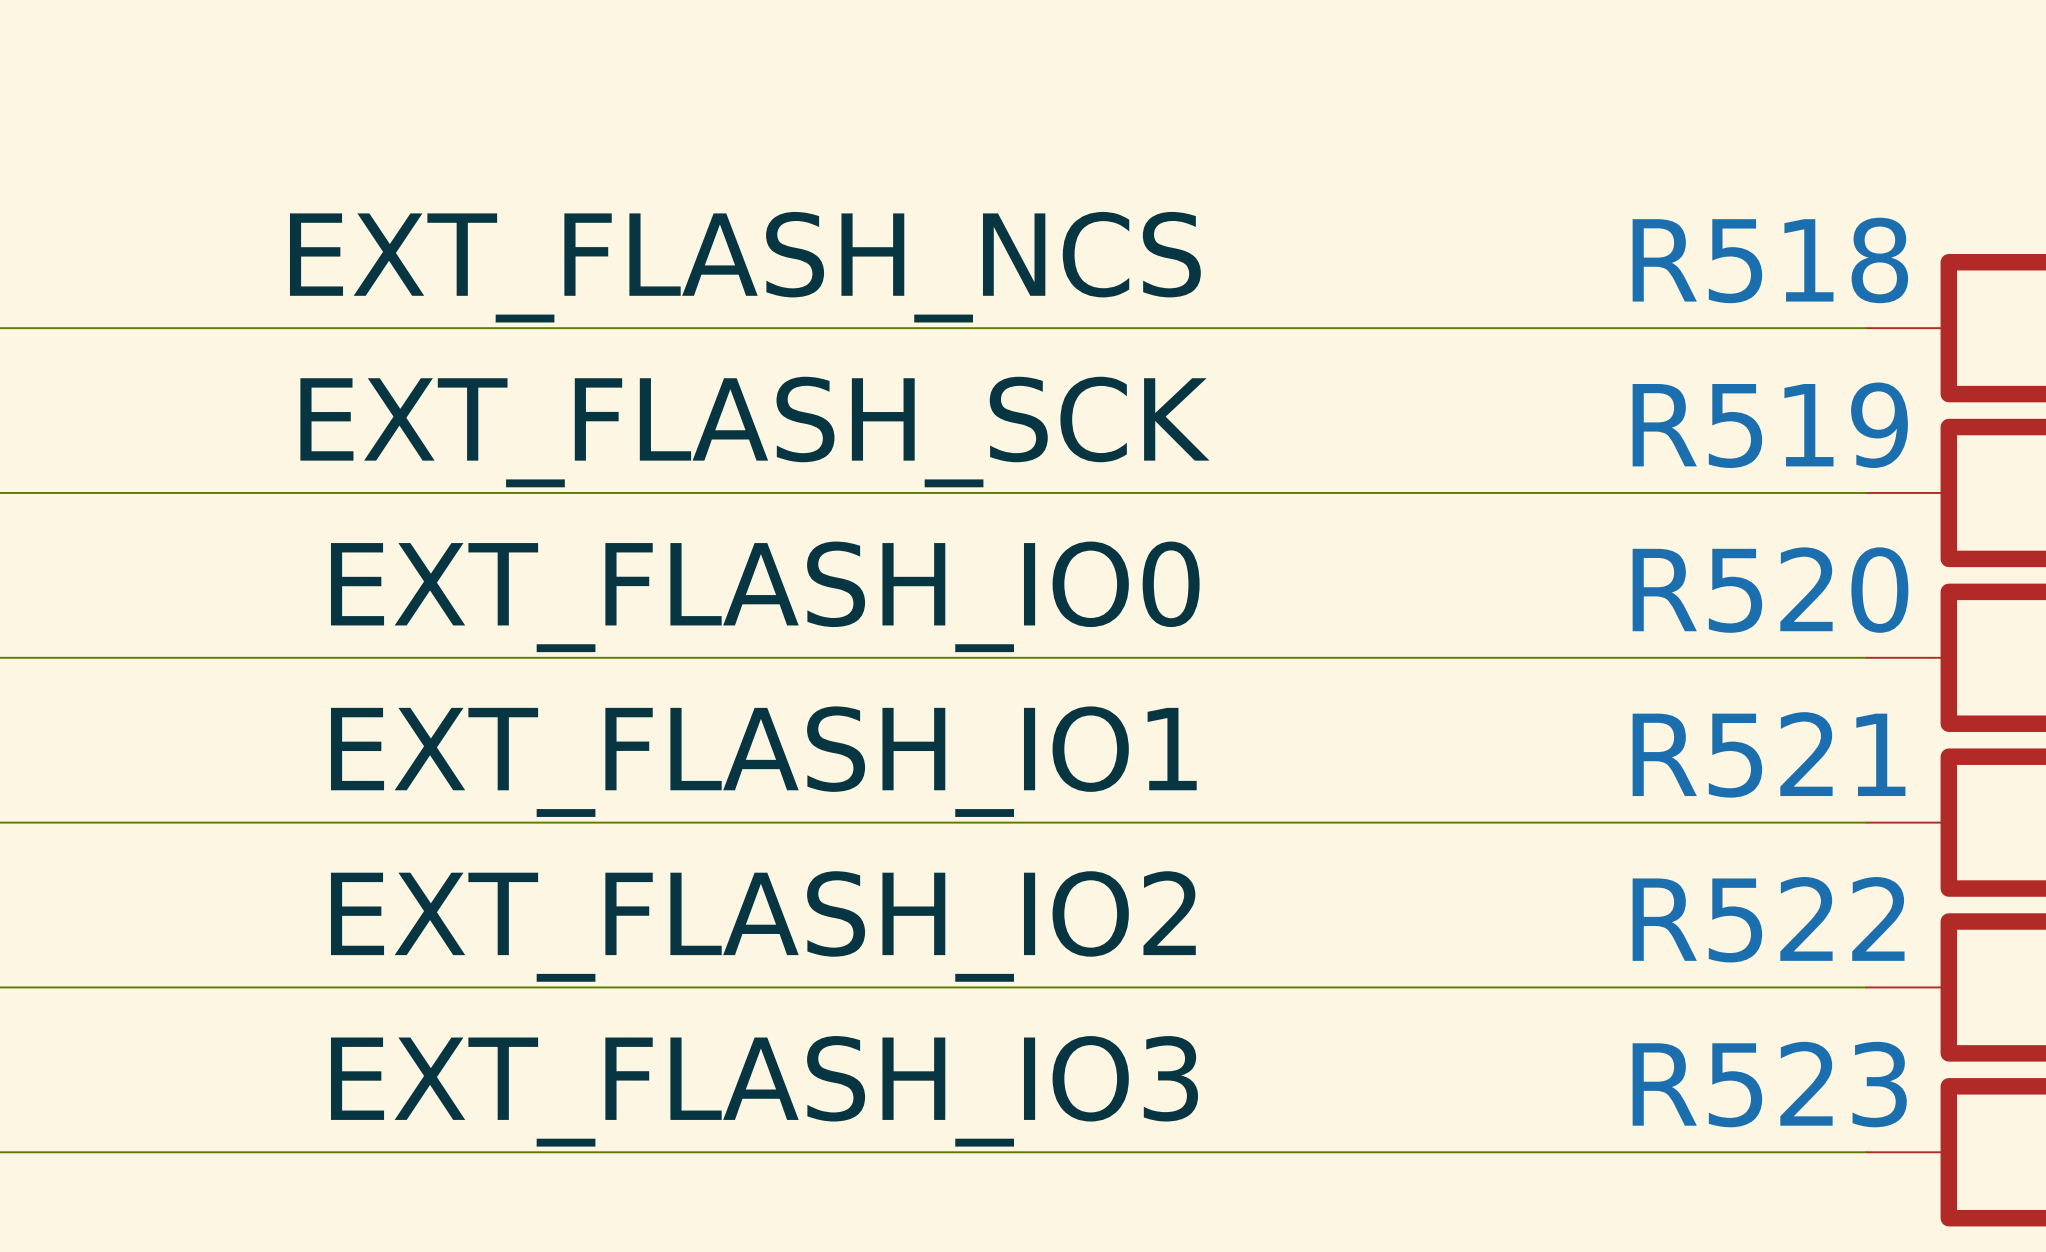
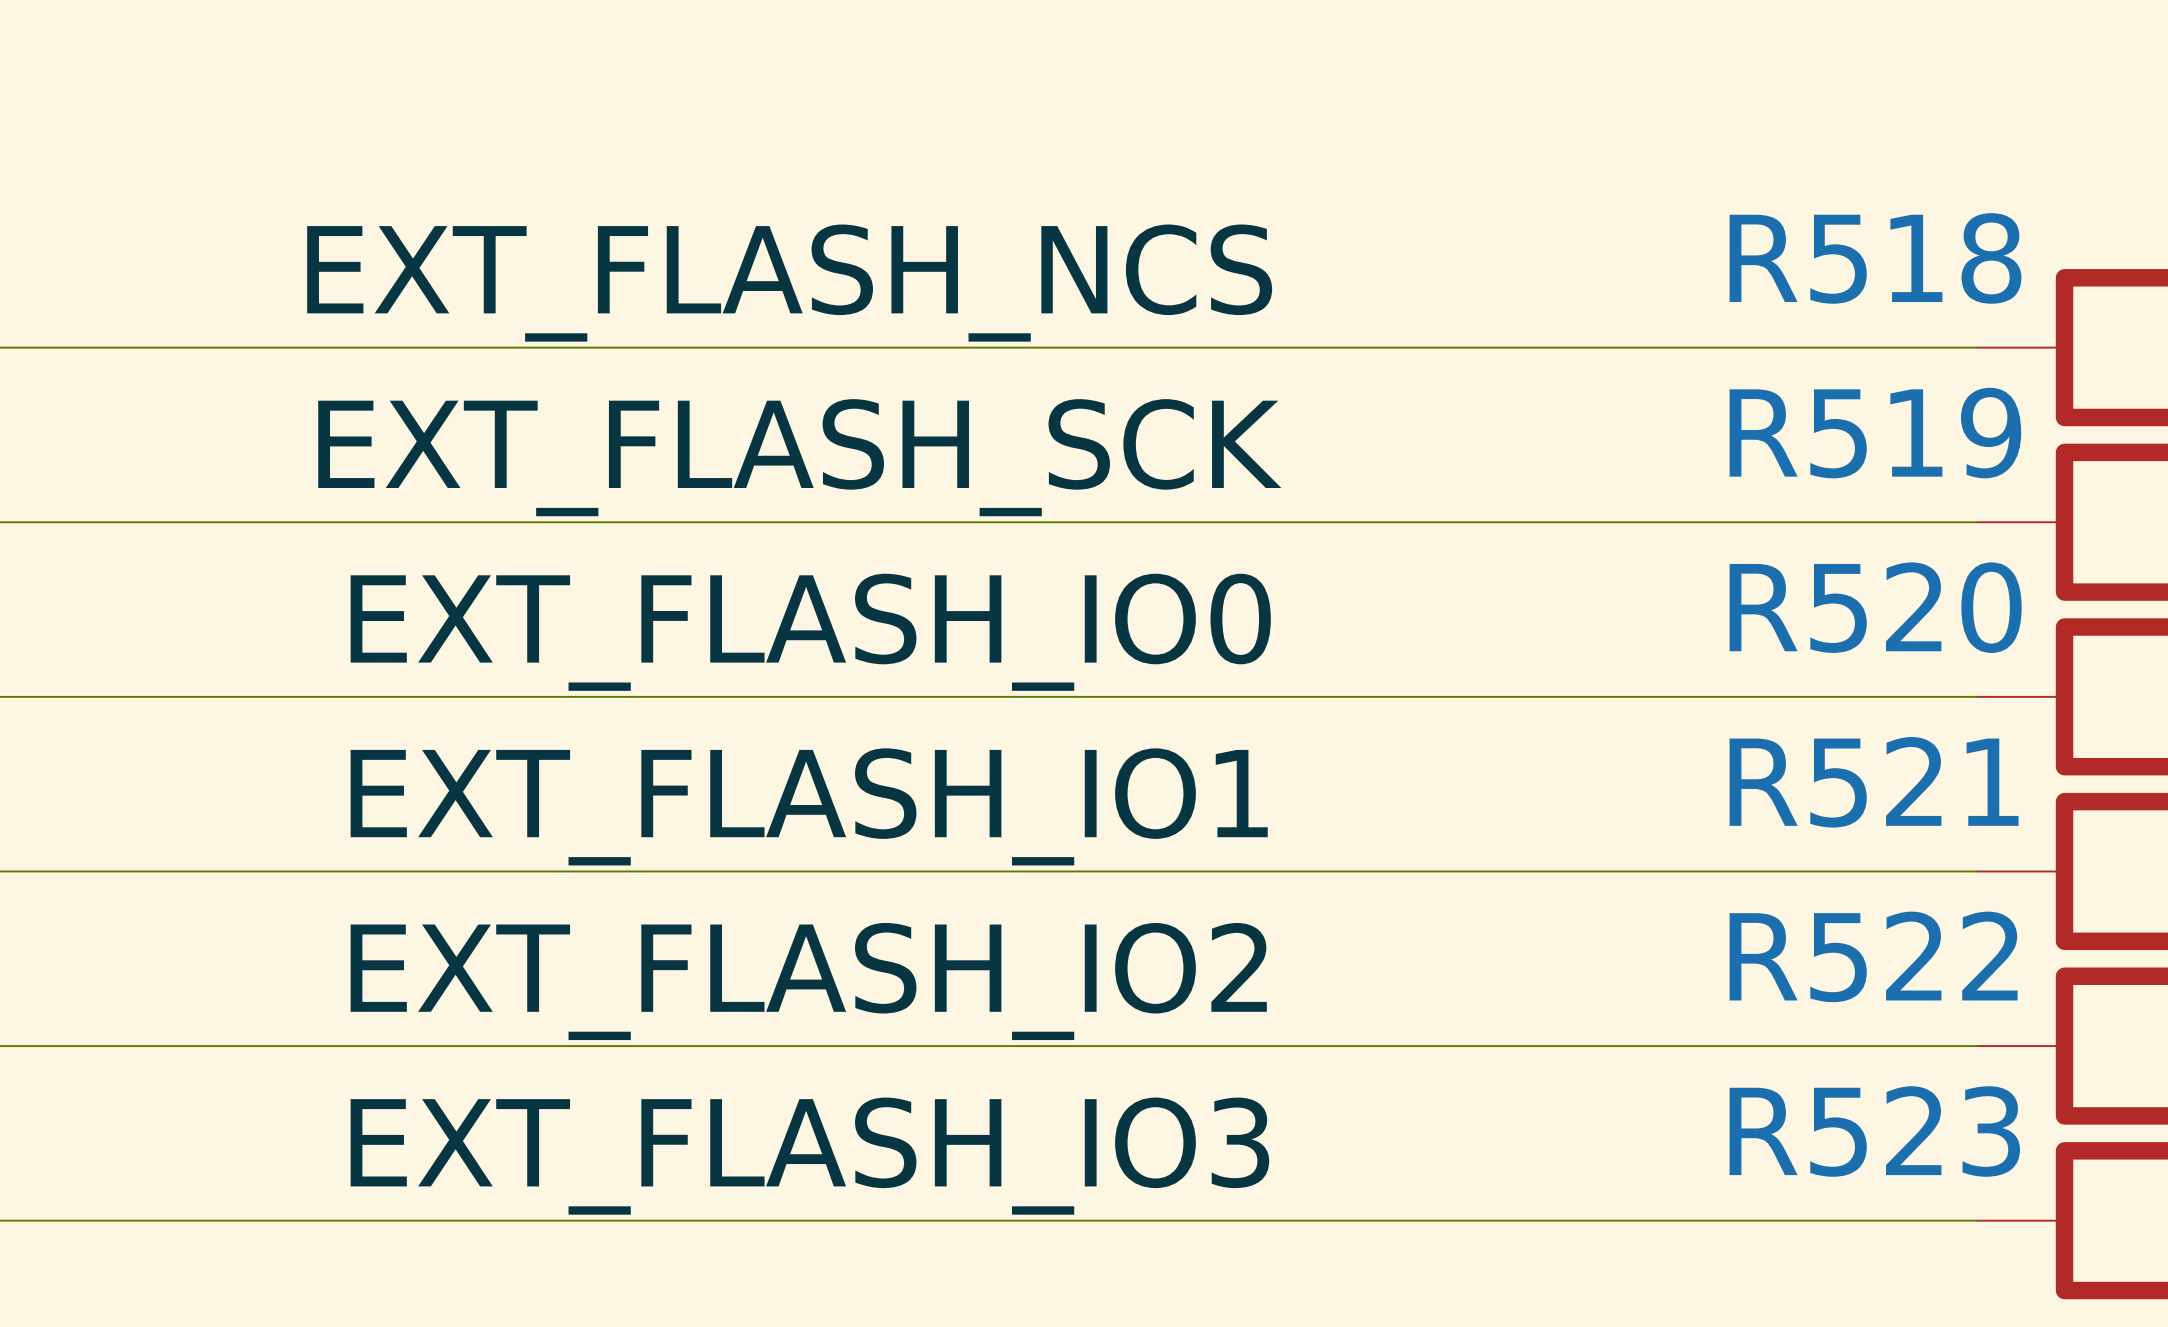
R518 name position: R518 (1770, 260) -> R518 (1875, 258)
R519 name position: R519 (1770, 425) -> R519 (1875, 433)
R520 name position: R520 (1770, 590) -> R520 (1875, 607)
R521 name position: R521 (1769, 754) -> R521 (1874, 782)
R522 name position: R522 (1768, 919) -> R522 (1873, 956)
R523 name position: R523 (1769, 1084) -> R523 (1874, 1131)

